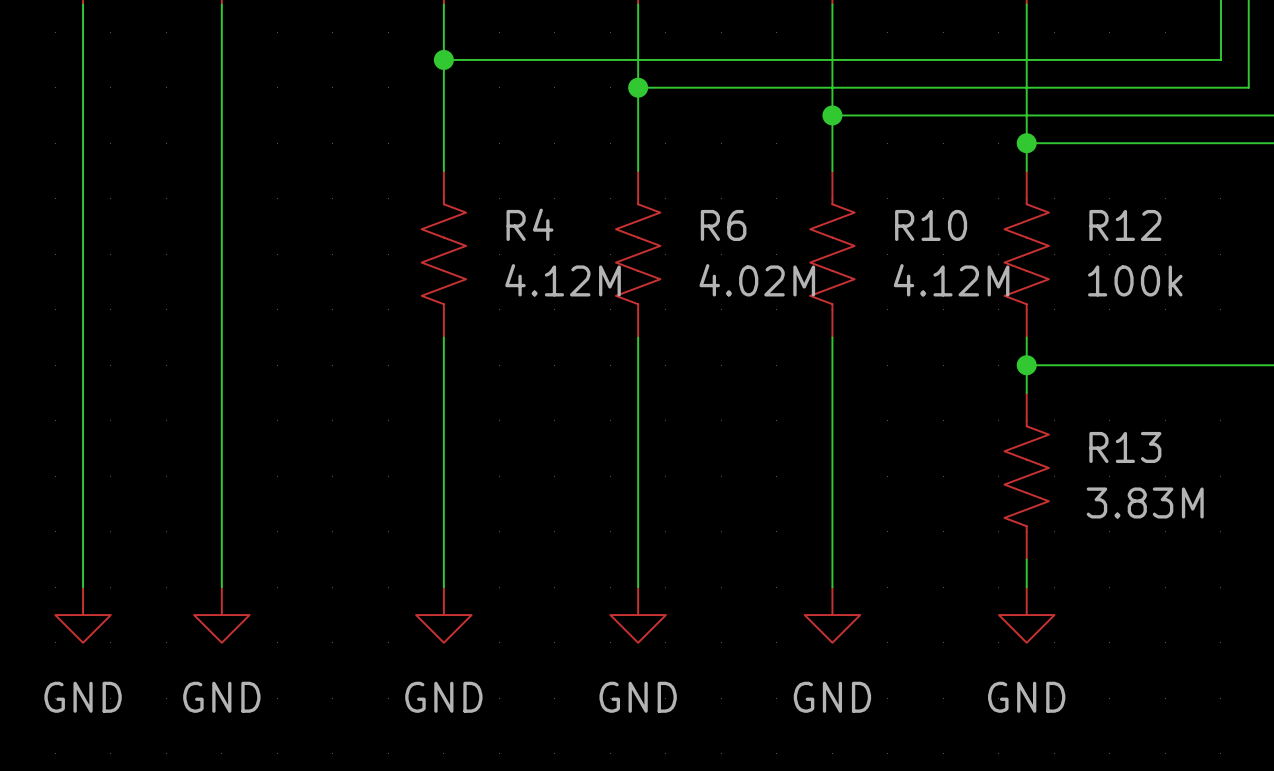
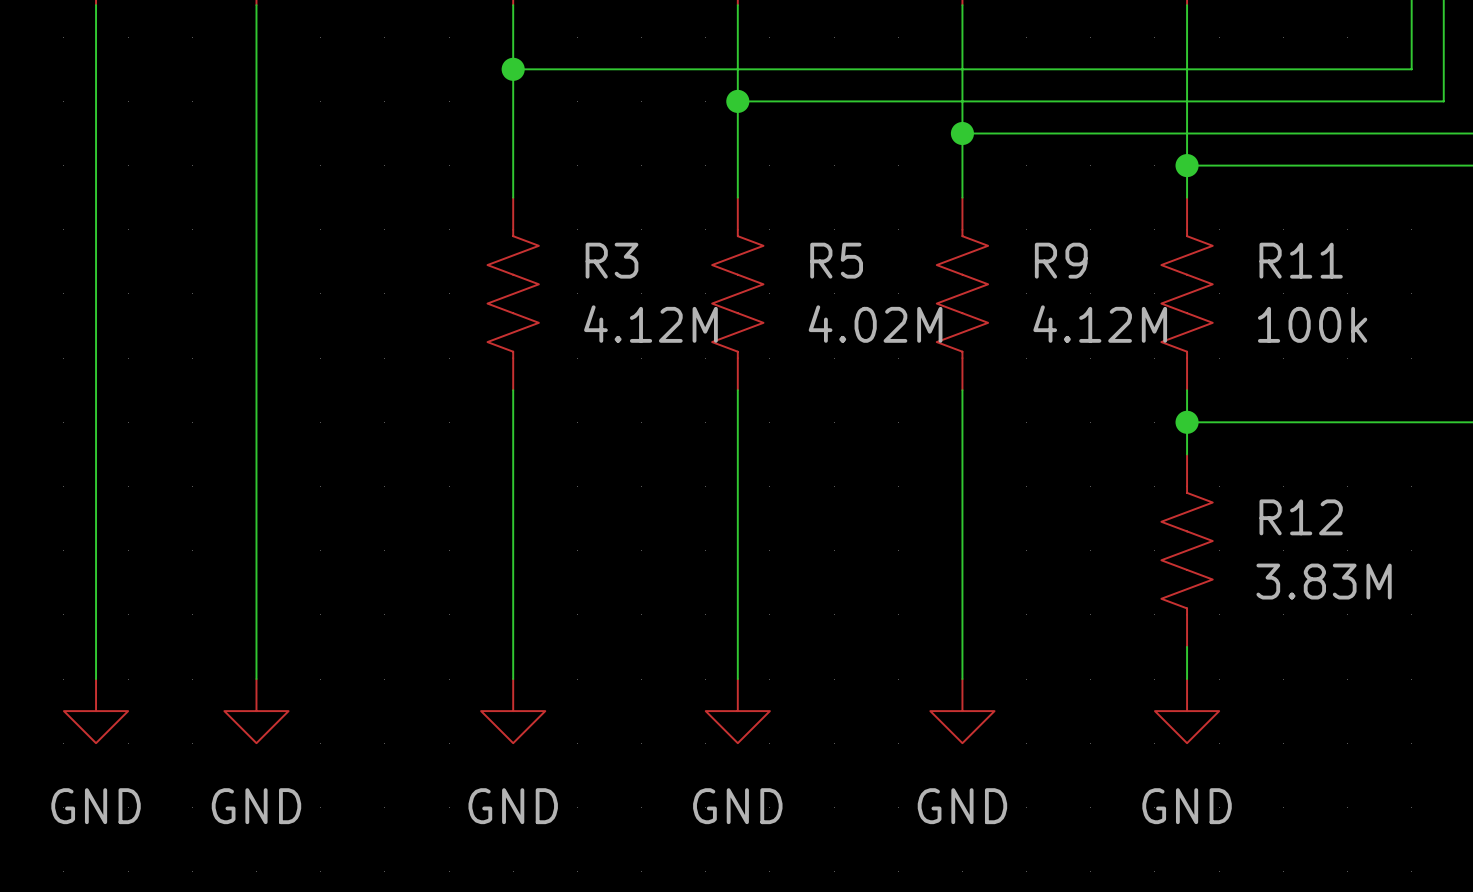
R4 name: R4 (529, 224) -> R3 (611, 260)
R6 name: R6 (723, 225) -> R5 (836, 260)
R10 name: R10 (931, 225) -> R9 (1061, 260)
R12 name: R12 (1125, 225) -> R11 (1301, 260)
R13 name: R13 (1125, 447) -> R12 (1301, 517)

